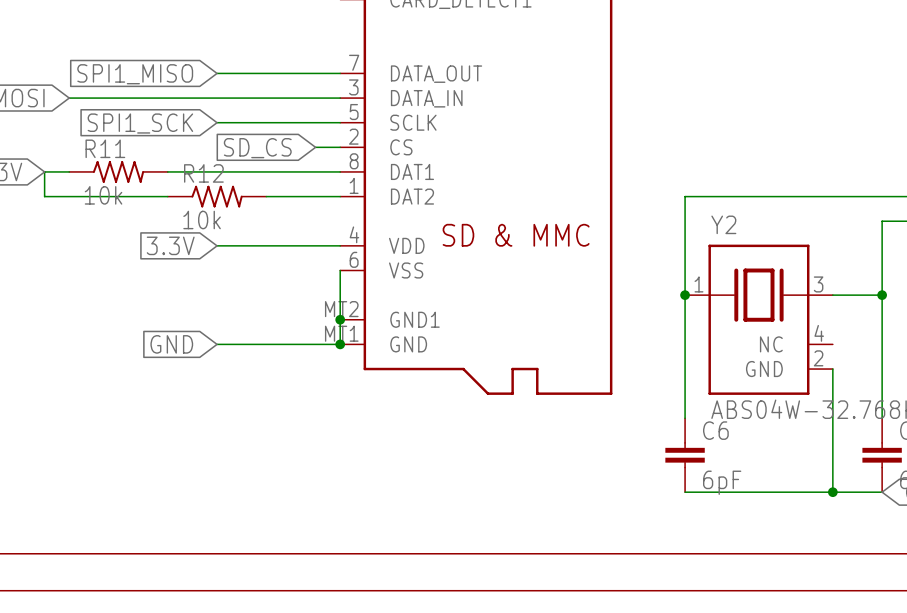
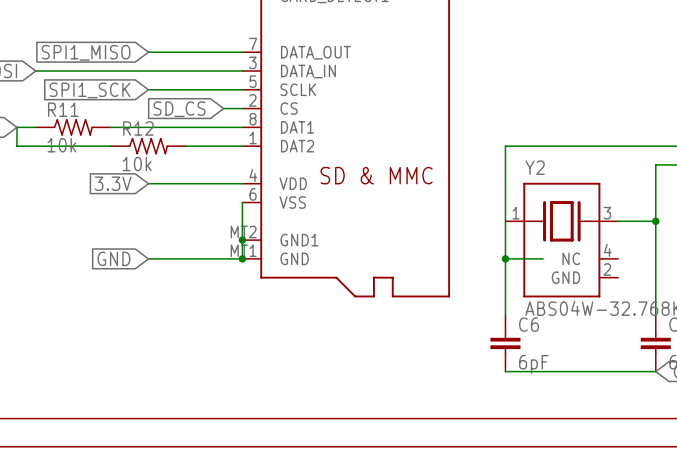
junction position: (685, 295) -> (505, 258)
wire: none -> (505, 258) (543, 258)
wire: (832, 369) (832, 492) -> none
junction: (832, 492) -> none

